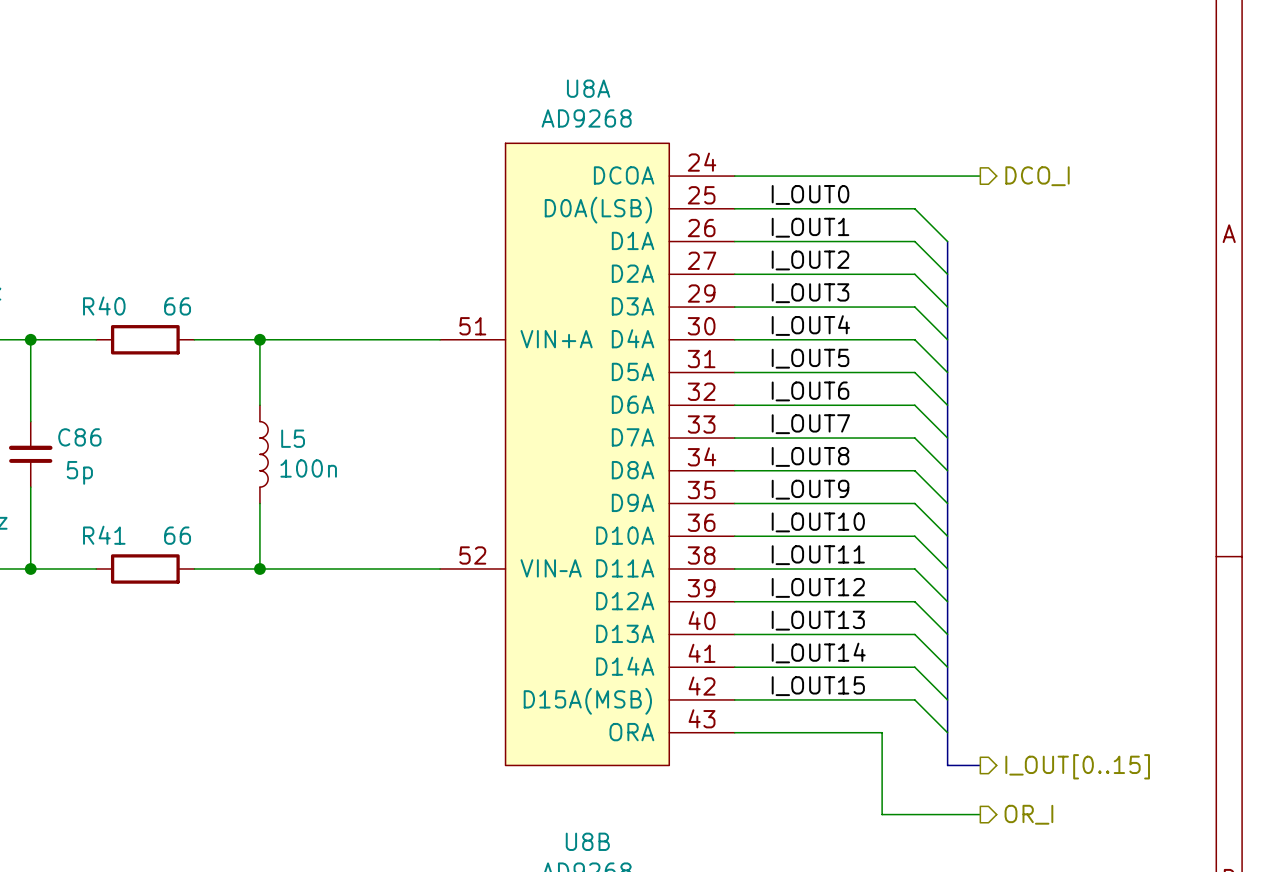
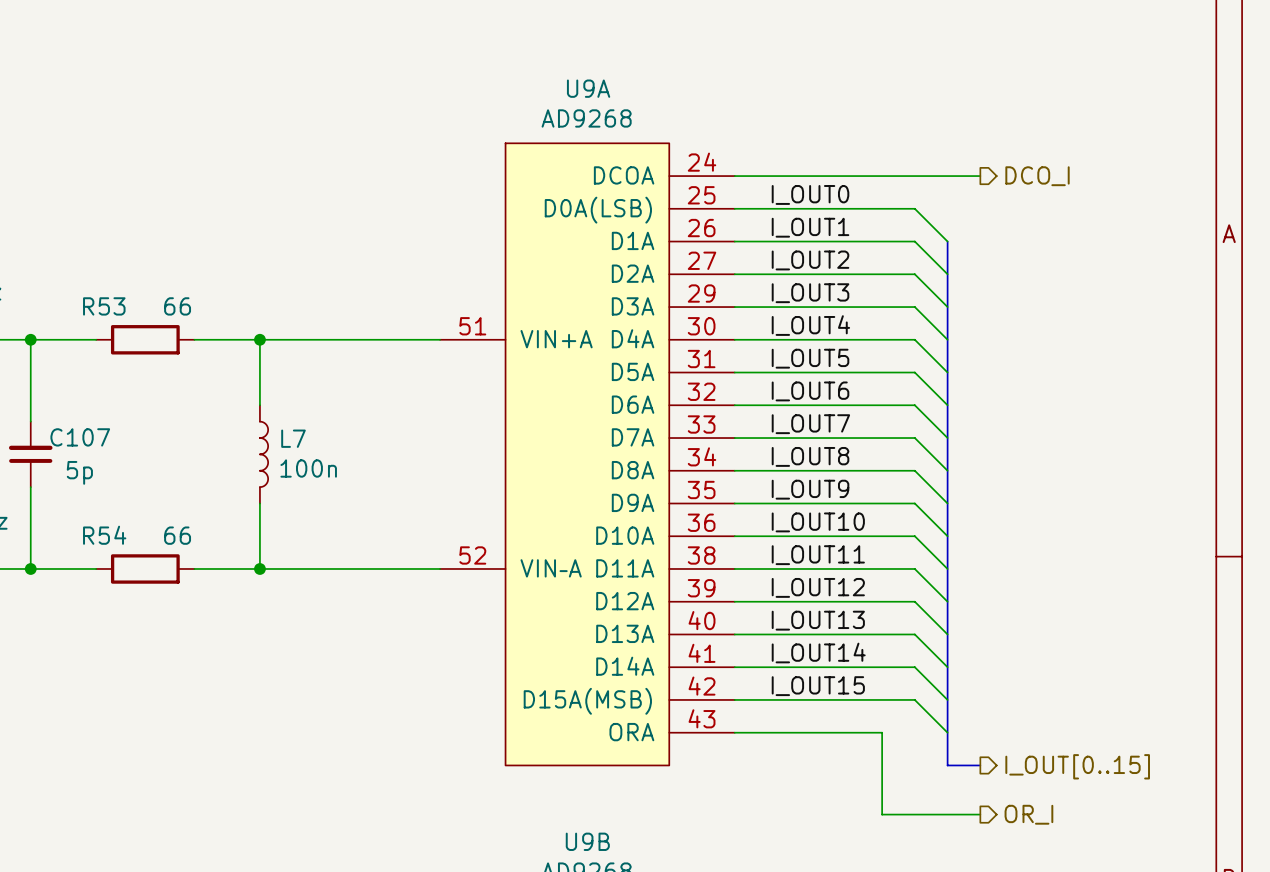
U8A name: U8A (588, 88) -> U9A (588, 88)
R40 name: R40 (104, 306) -> R53 (104, 306)
C86 name: C86 (79, 437) -> C107 (80, 437)
L5 name: L5 (293, 438) -> L7 (293, 438)
R41 name: R41 (104, 535) -> R54 (104, 535)
U8B name: U8B (587, 841) -> U9B (587, 841)

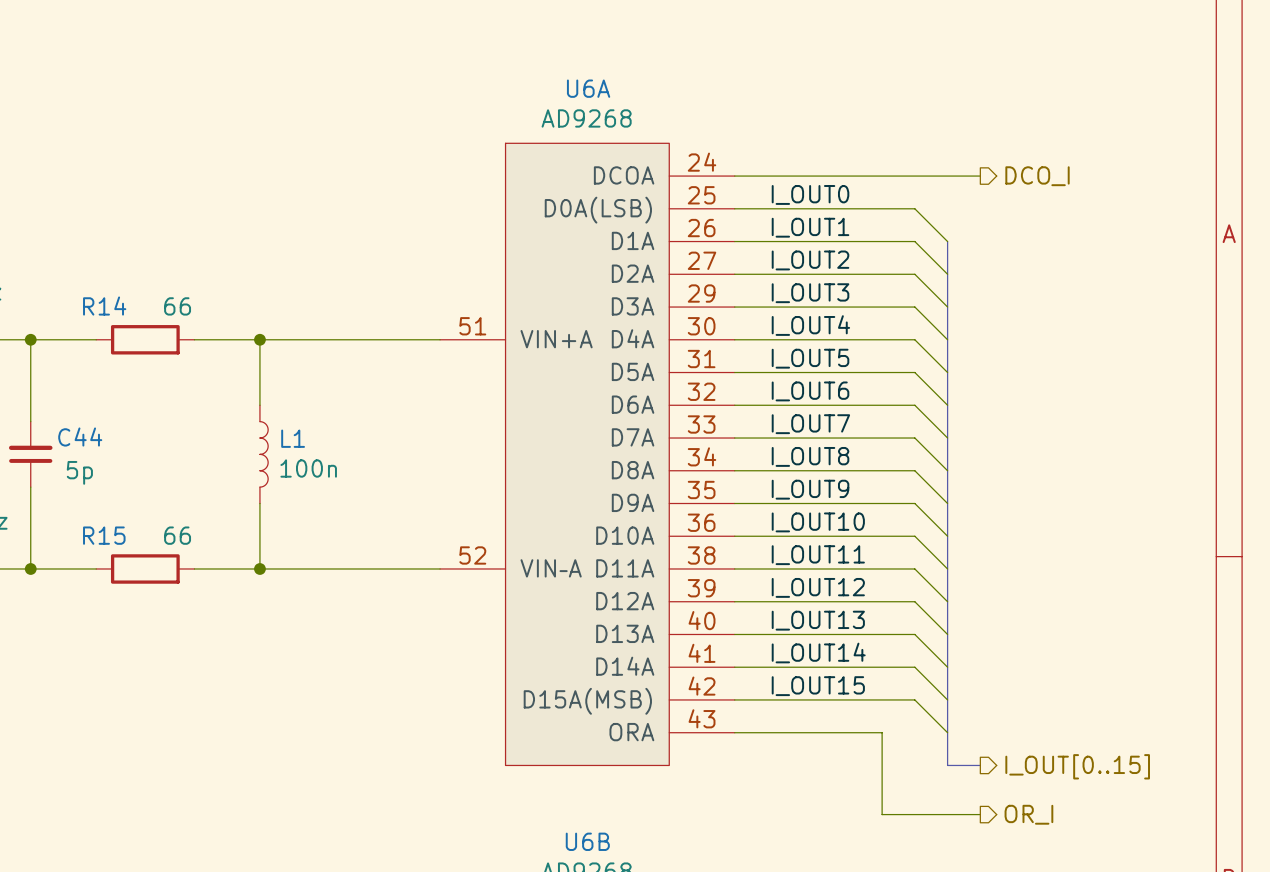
U9A name: U9A (588, 88) -> U6A (588, 88)
R53 name: R53 (104, 306) -> R14 (104, 306)
C107 name: C107 (80, 437) -> C44 (80, 437)
L7 name: L7 (293, 438) -> L1 (293, 438)
R54 name: R54 (104, 535) -> R15 (104, 535)
U9B name: U9B (587, 841) -> U6B (587, 841)

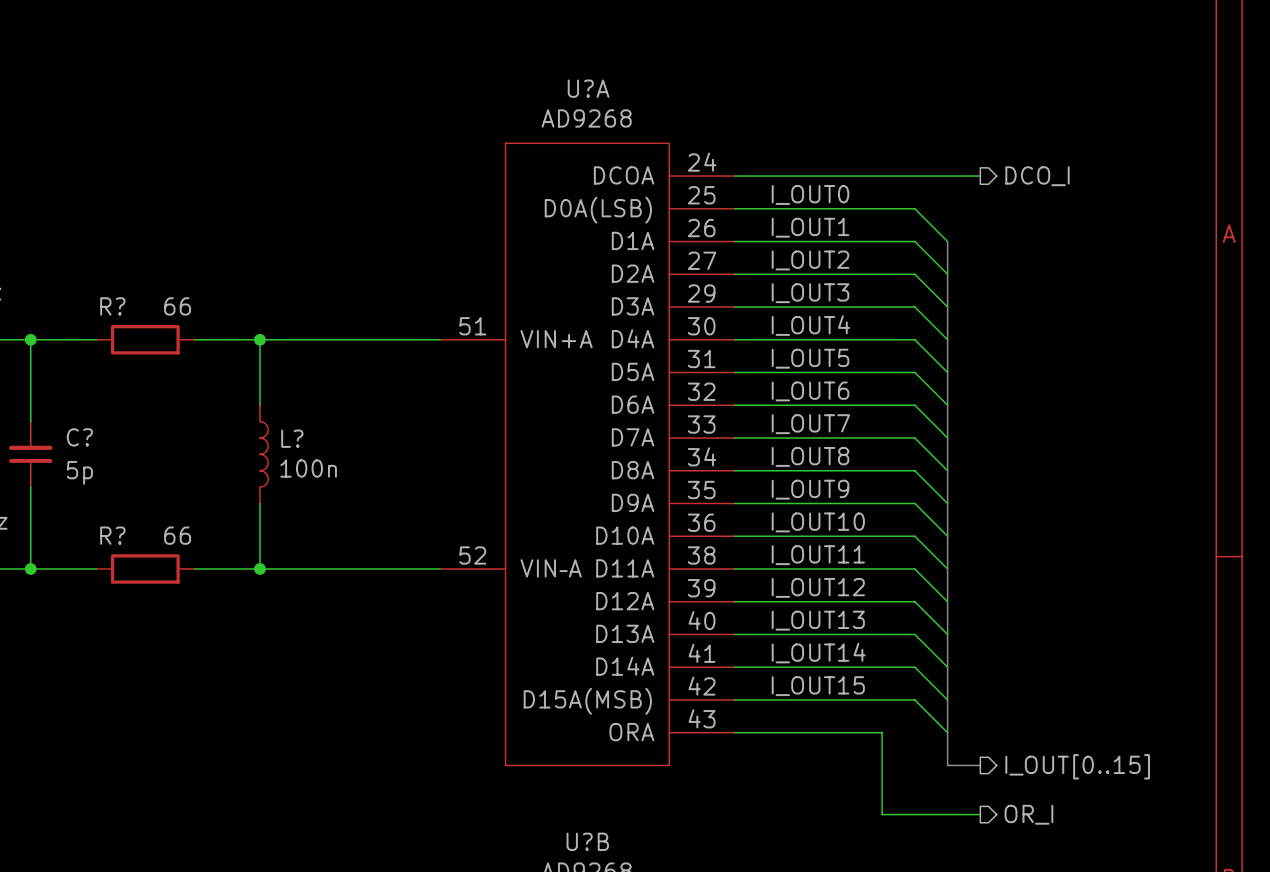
U6A name: U6A (588, 88) -> U?A (588, 88)
R14 name: R14 (104, 306) -> R? (112, 306)
C44 name: C44 (80, 437) -> C? (79, 437)
L1 name: L1 (293, 438) -> L? (292, 438)
R15 name: R15 (104, 535) -> R? (112, 535)
U6B name: U6B (587, 841) -> U?B (587, 841)

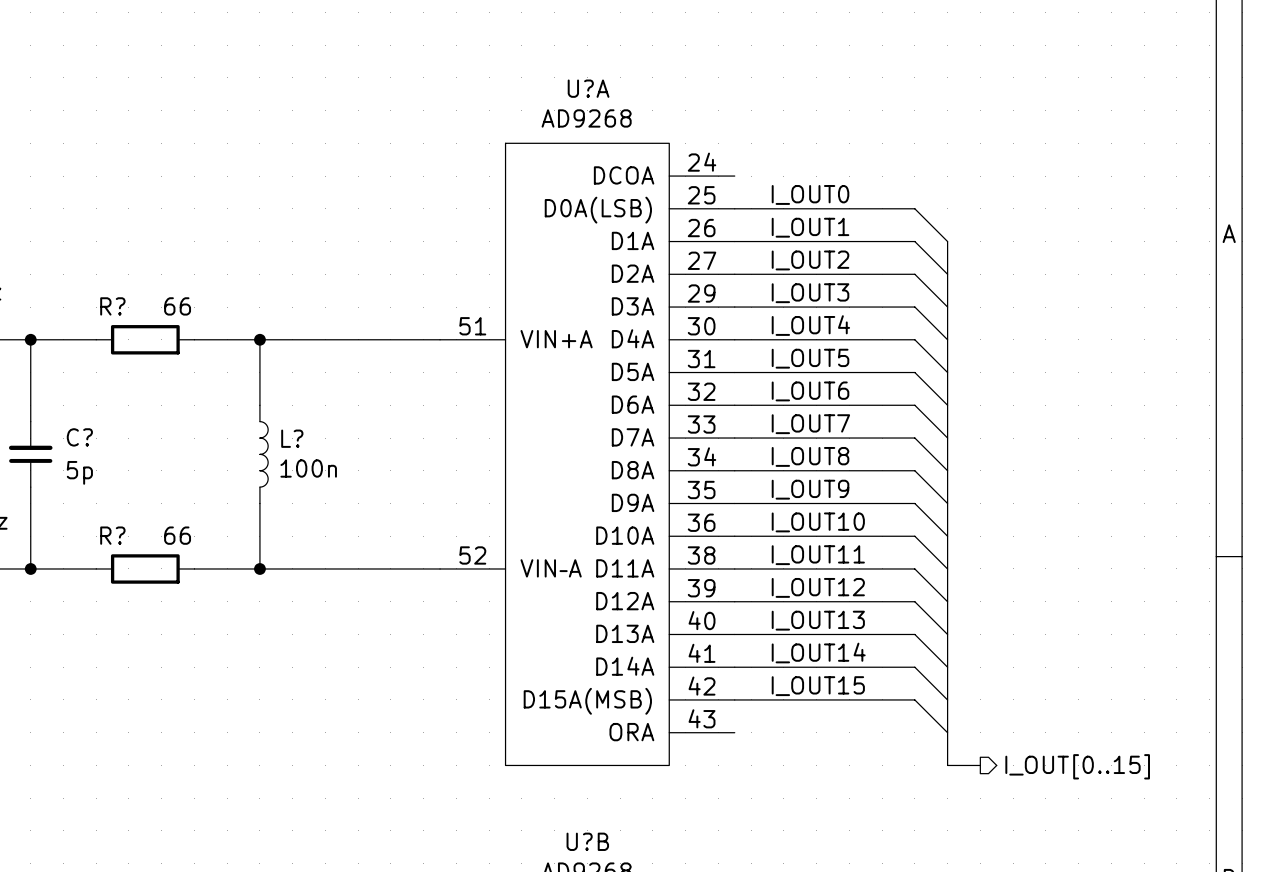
wire: (734, 176) (980, 176) -> none
hierarchical label: DCO_I (1037, 176) -> none
wire: (734, 732) (882, 732) (882, 814) (980, 814) -> none
hierarchical label: OR_I (1028, 814) -> none

